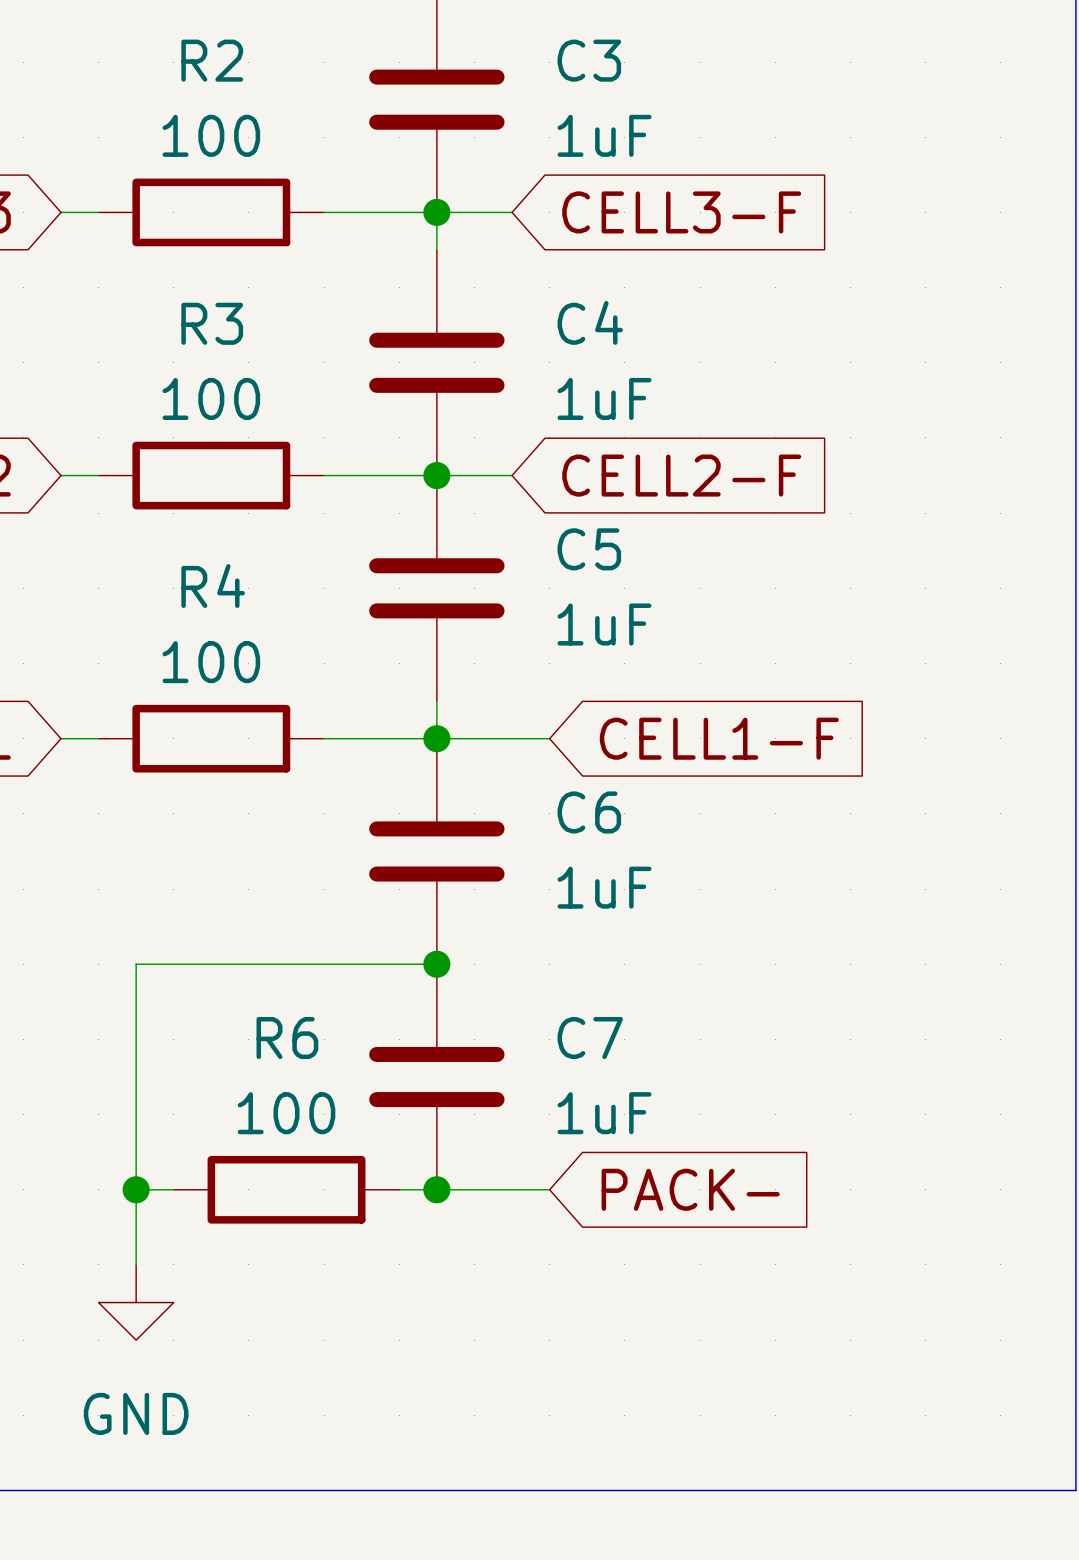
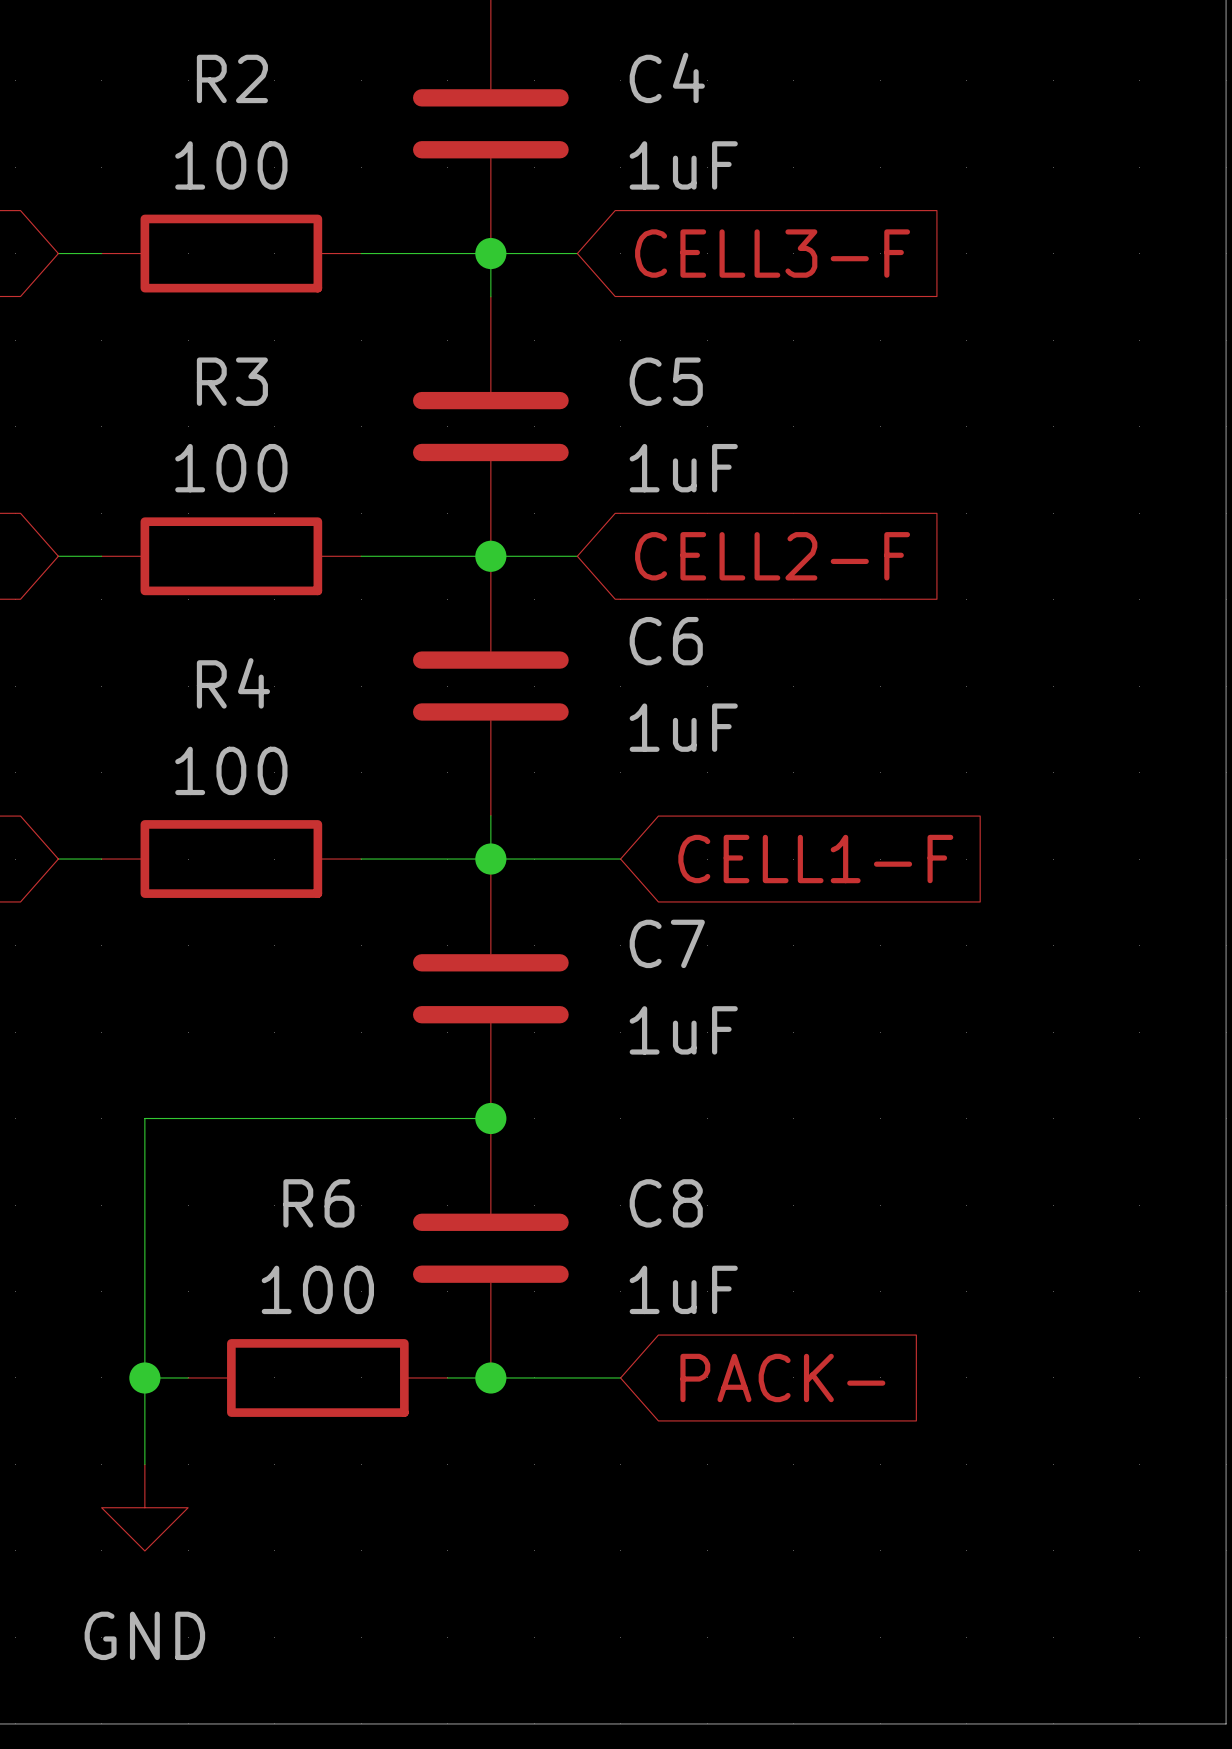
C3 name: C3 (589, 60) -> C4 (667, 77)
C4 name: C4 (590, 322) -> C5 (666, 381)
C5 name: C5 (589, 549) -> C6 (666, 641)
C6 name: C6 (589, 812) -> C7 (667, 943)
C7 name: C7 (590, 1038) -> C8 (666, 1203)

